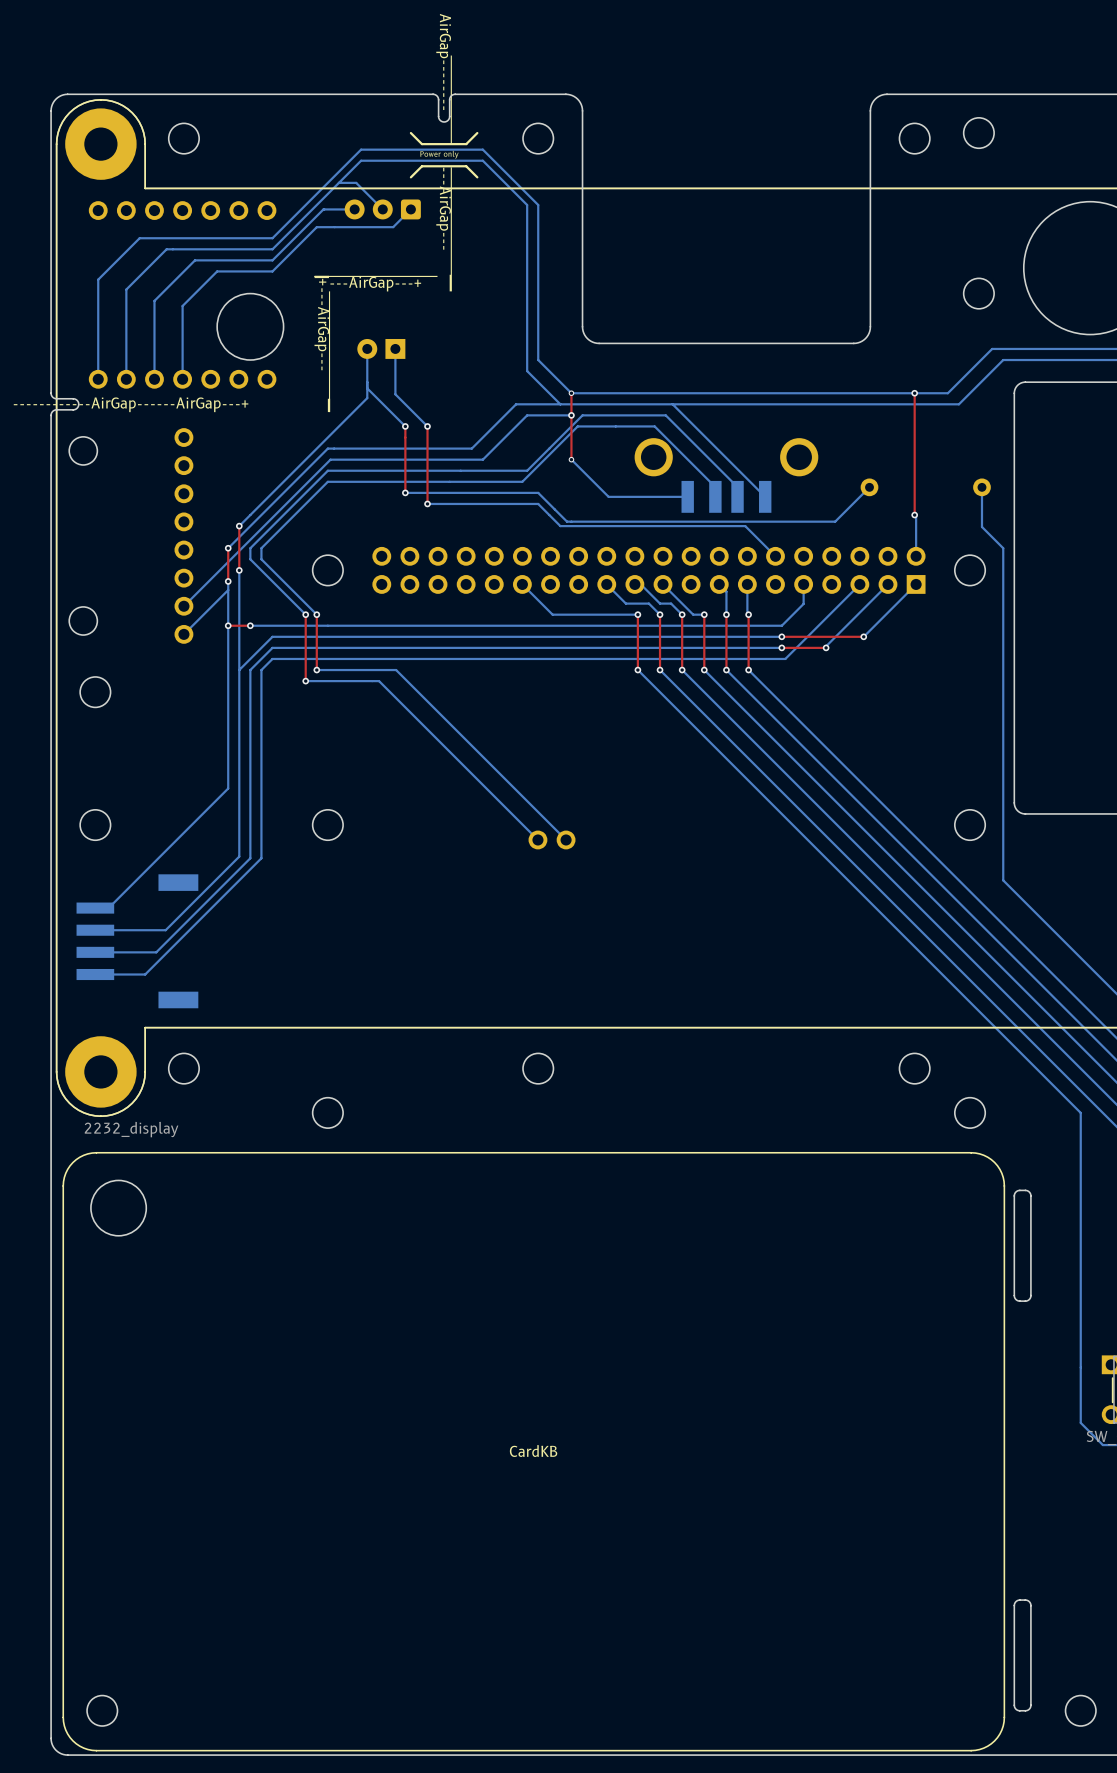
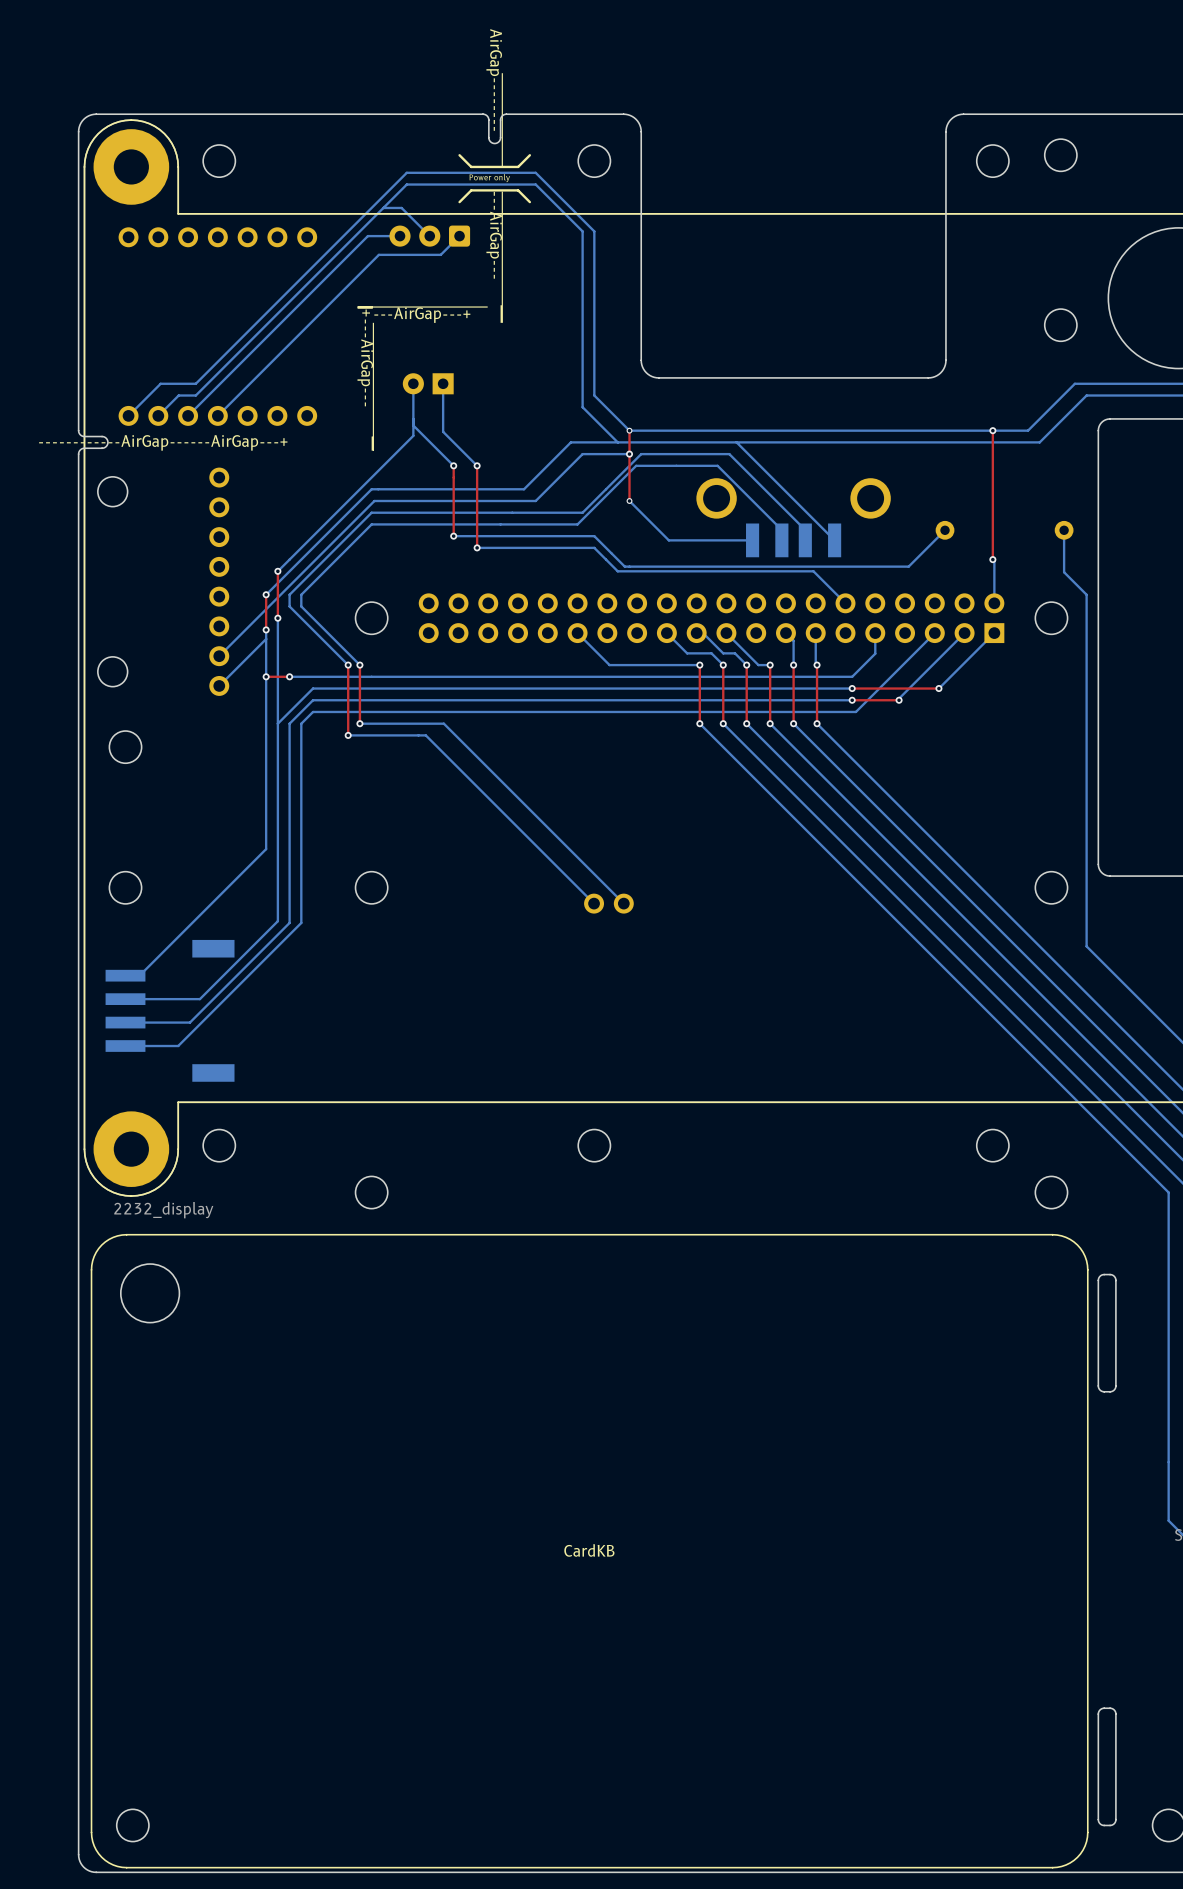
bottom track: (324, 209) (272, 260) (195, 260) (154, 300) (154, 379) -> (367, 236) (188, 415)
bottom track: (334, 227) (316, 227) (272, 271) (217, 271) (182, 305) (182, 379) -> (378, 254) (217, 415)
bottom track: (272, 238) (139, 238) (98, 279) (98, 379) -> (313, 266) (195, 383) (160, 383) (128, 415)
bottom track: (272, 249) (166, 249) (126, 289) (126, 379) -> (313, 278) (195, 395) (178, 395) (158, 415)
round board edge: [216, 293, 284, 361] -> none

